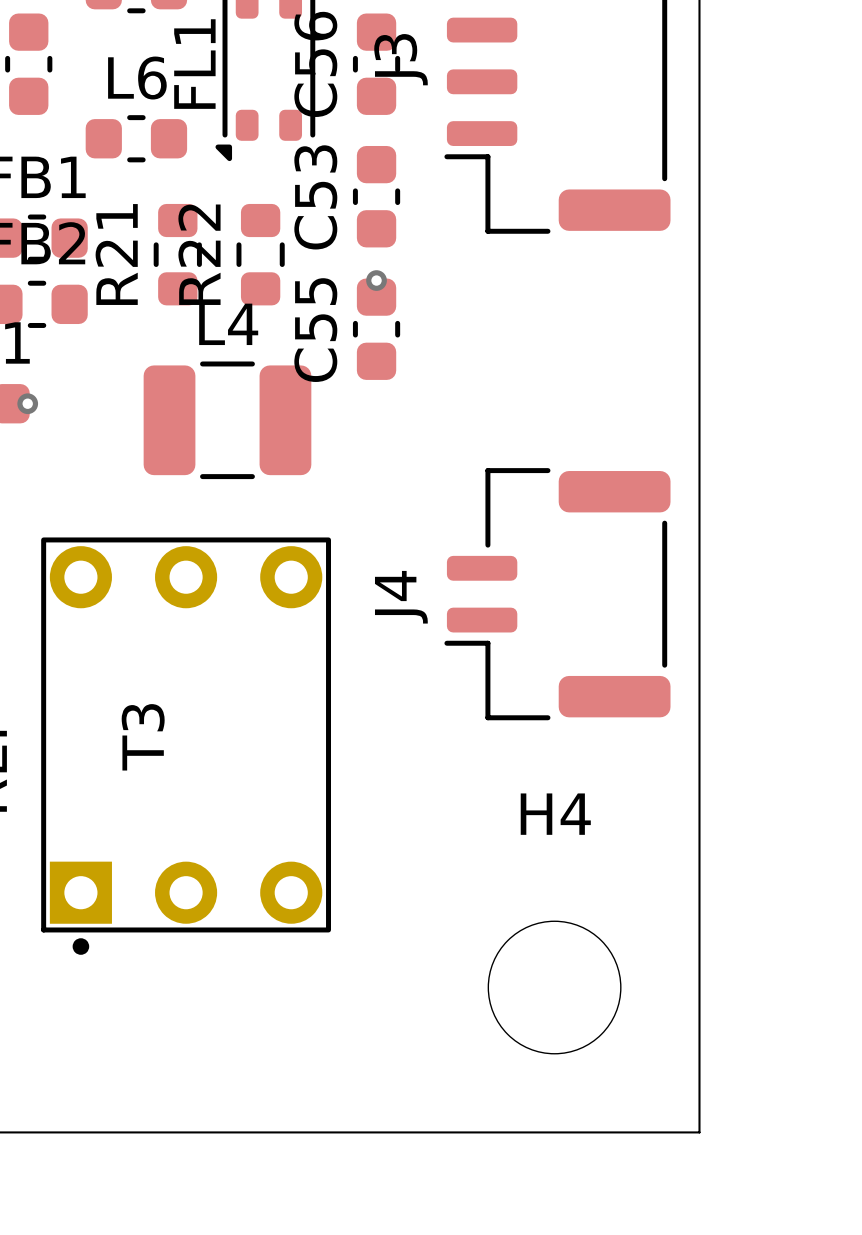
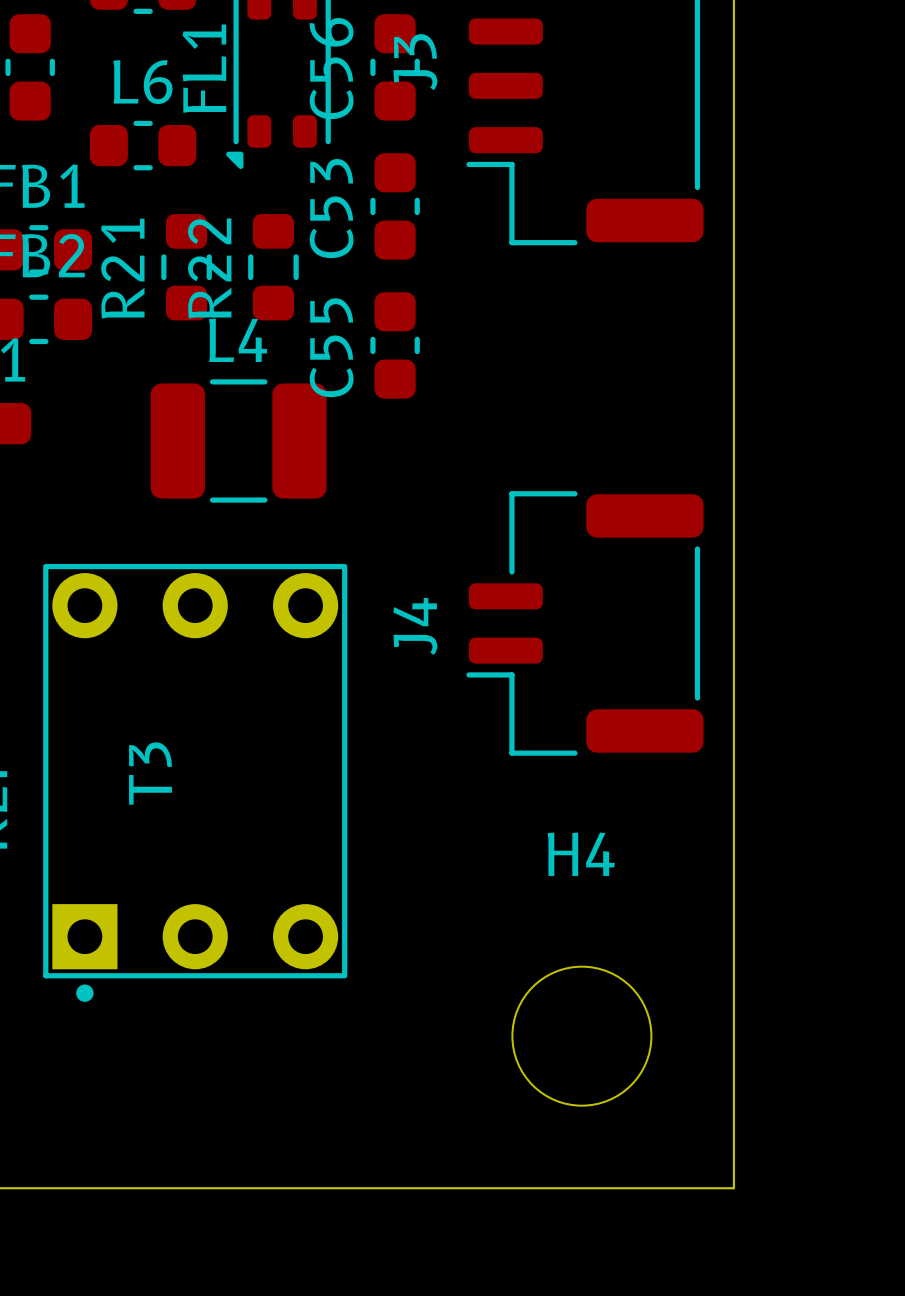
via: (376, 280) -> none
via: (27, 403) -> none

